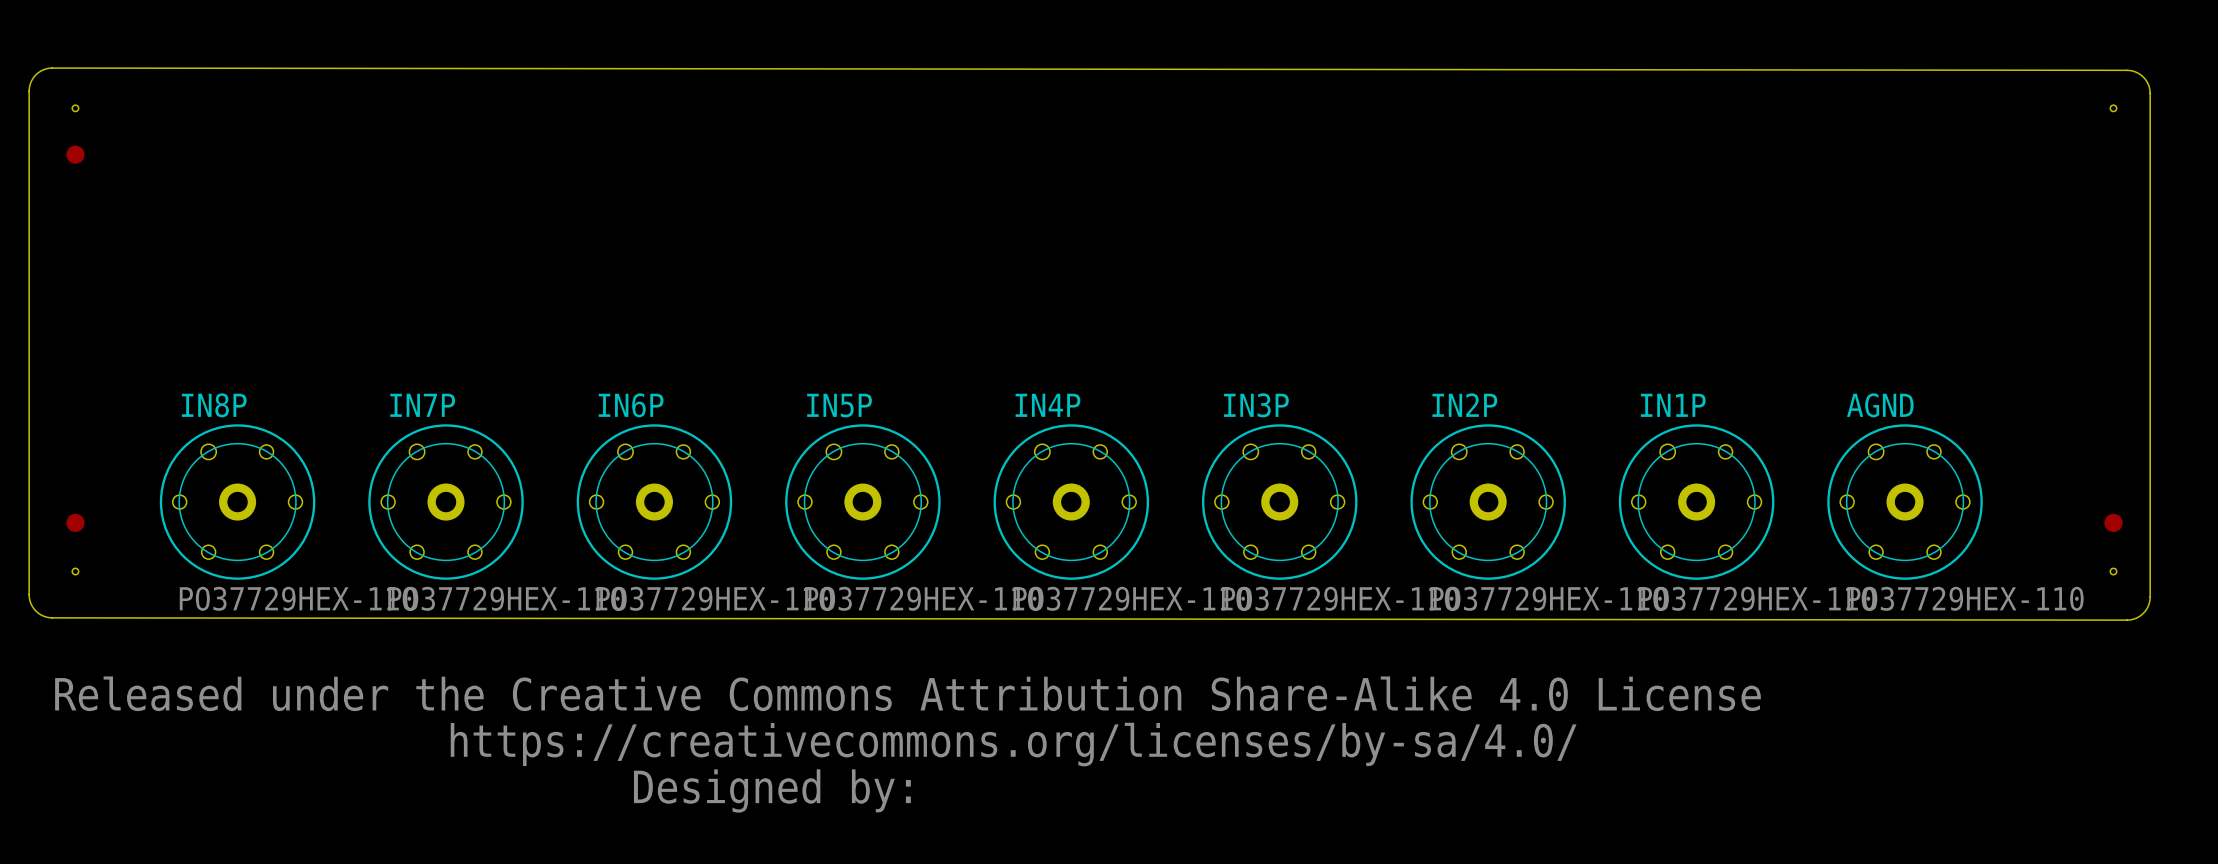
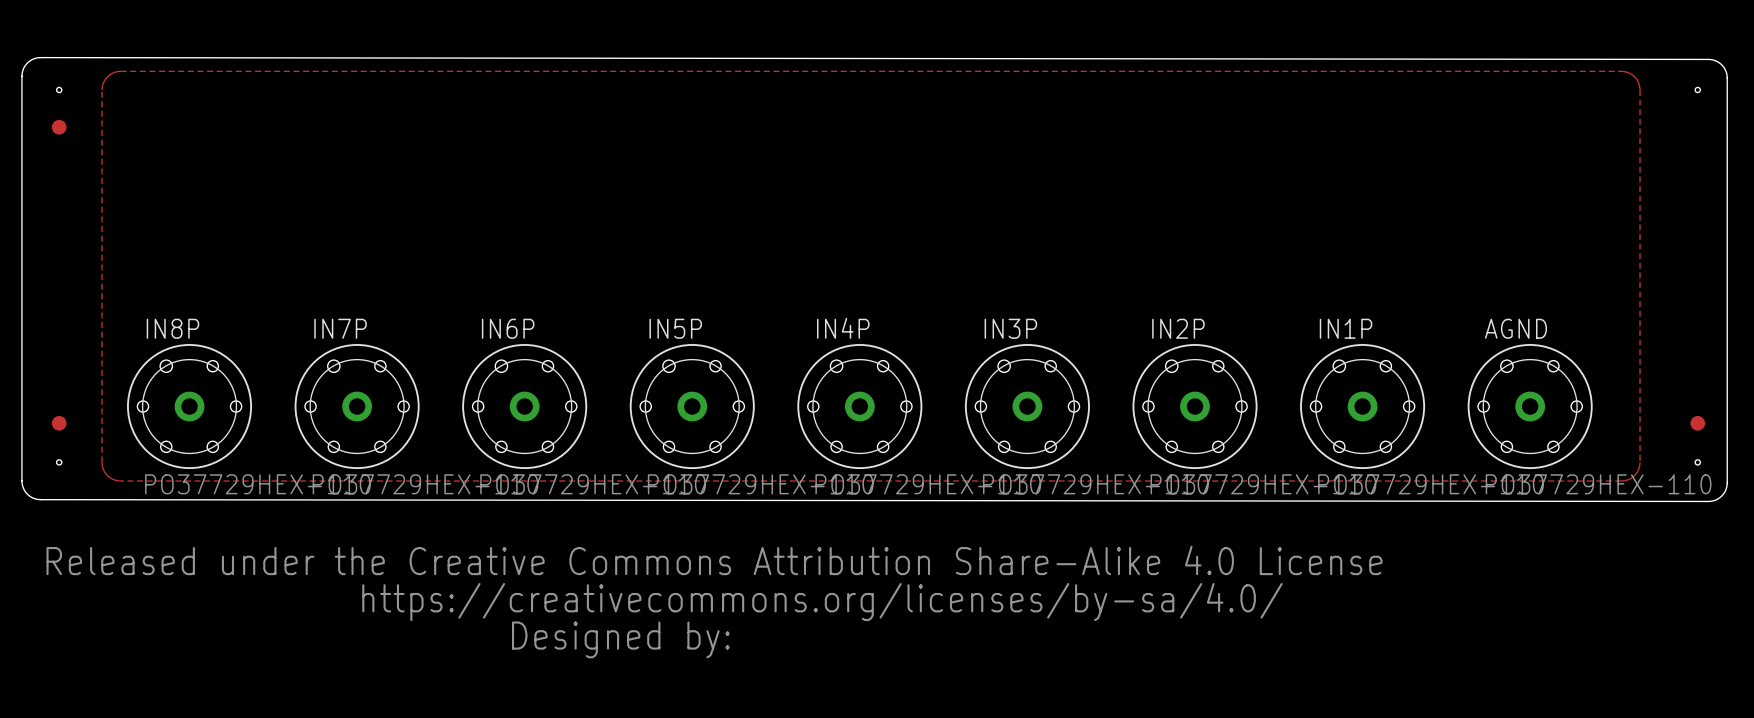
zone outline: none -> (120, 71) (107, 76) (102, 89) (102, 462) (105, 473) (115, 480) (1621, 481) (1632, 477) (1639, 467) (1640, 89) (1636, 78) (1626, 72) (120, 71)

